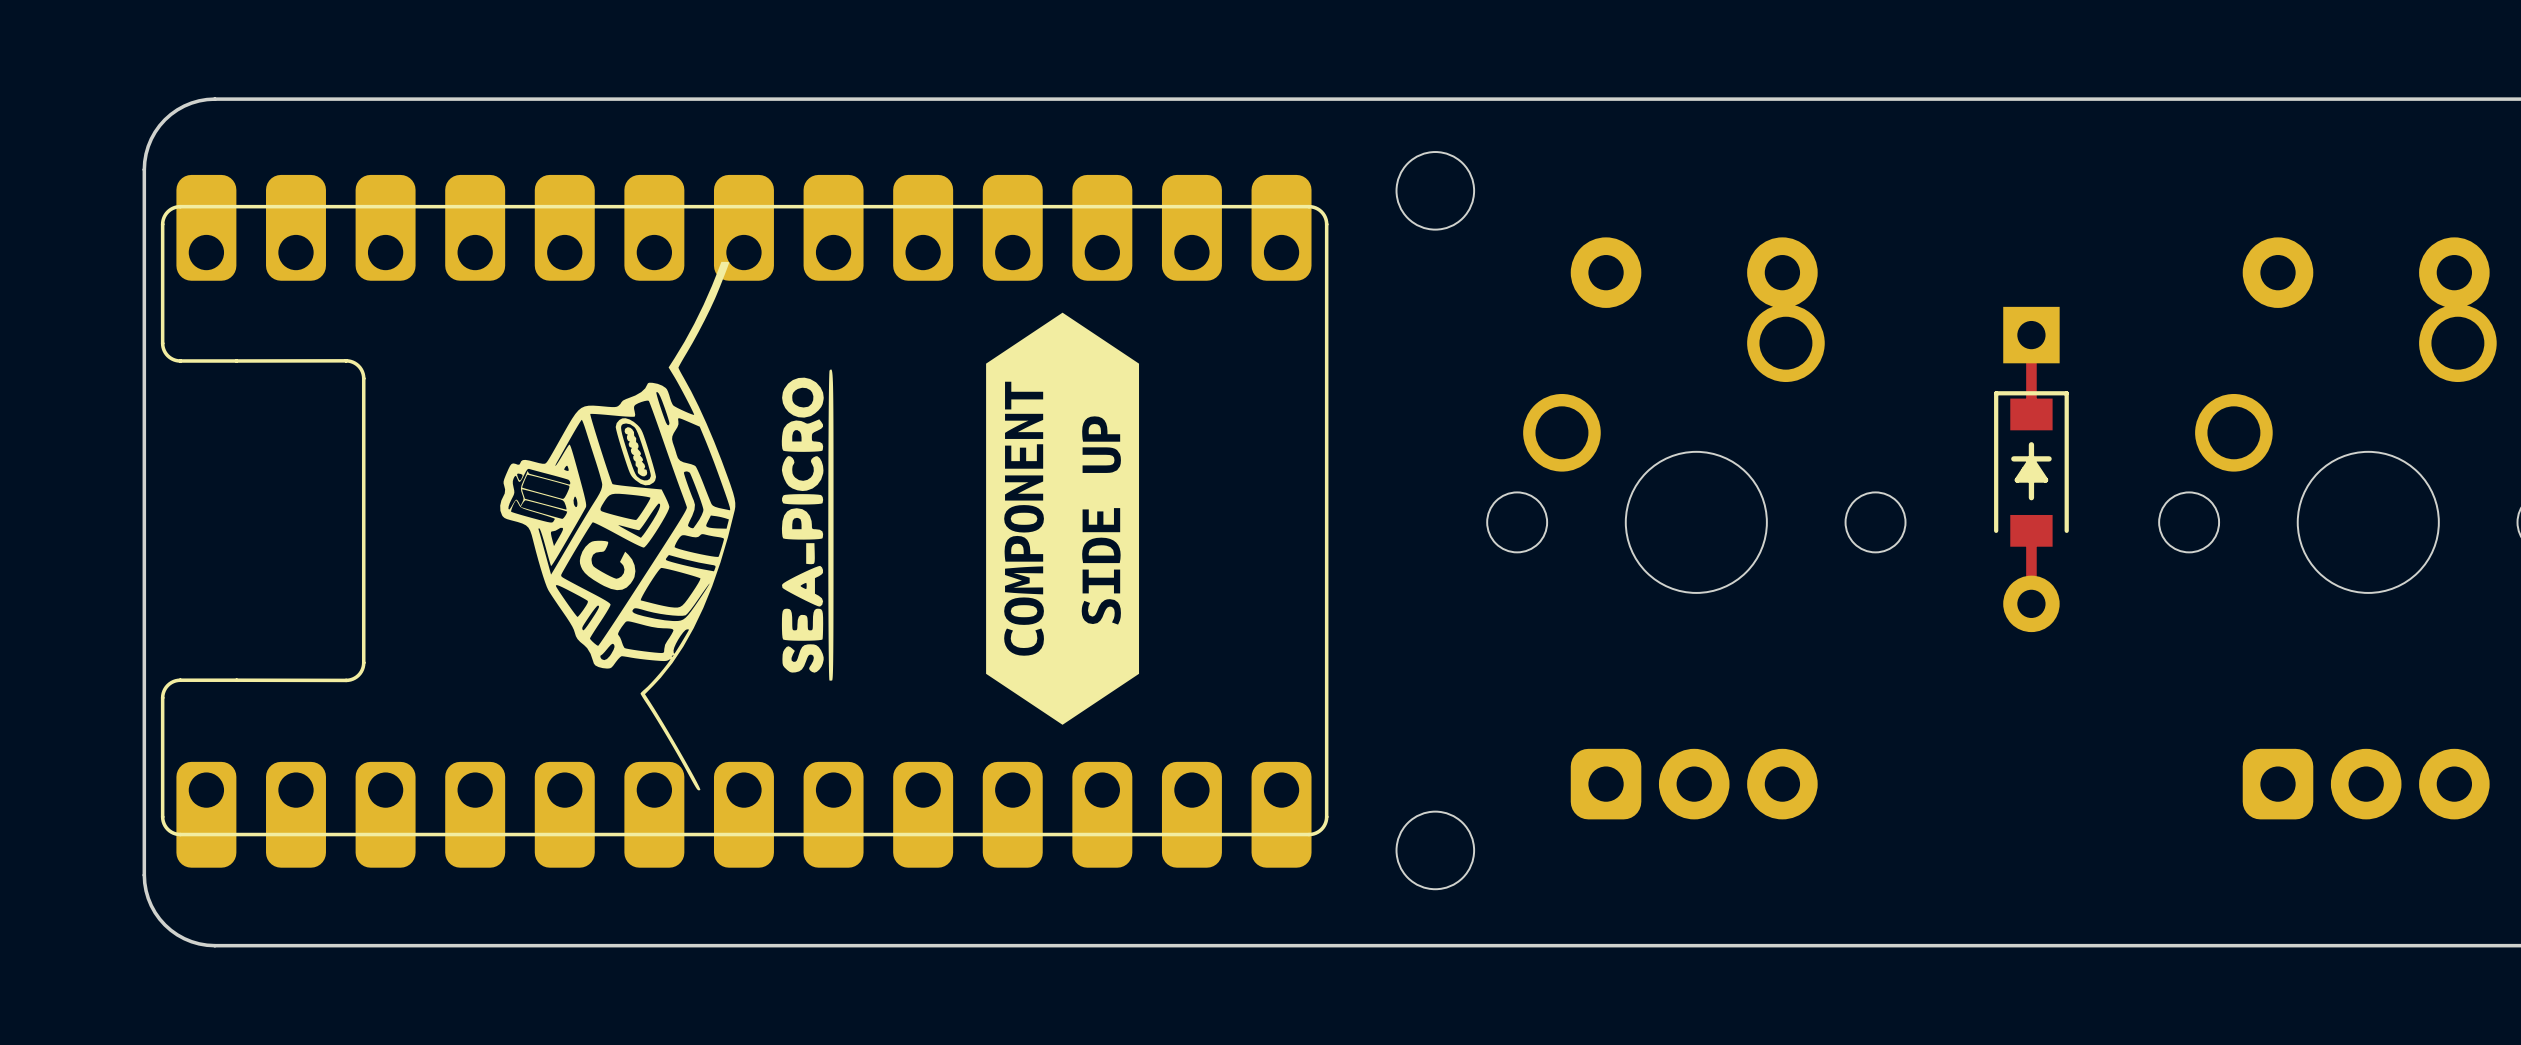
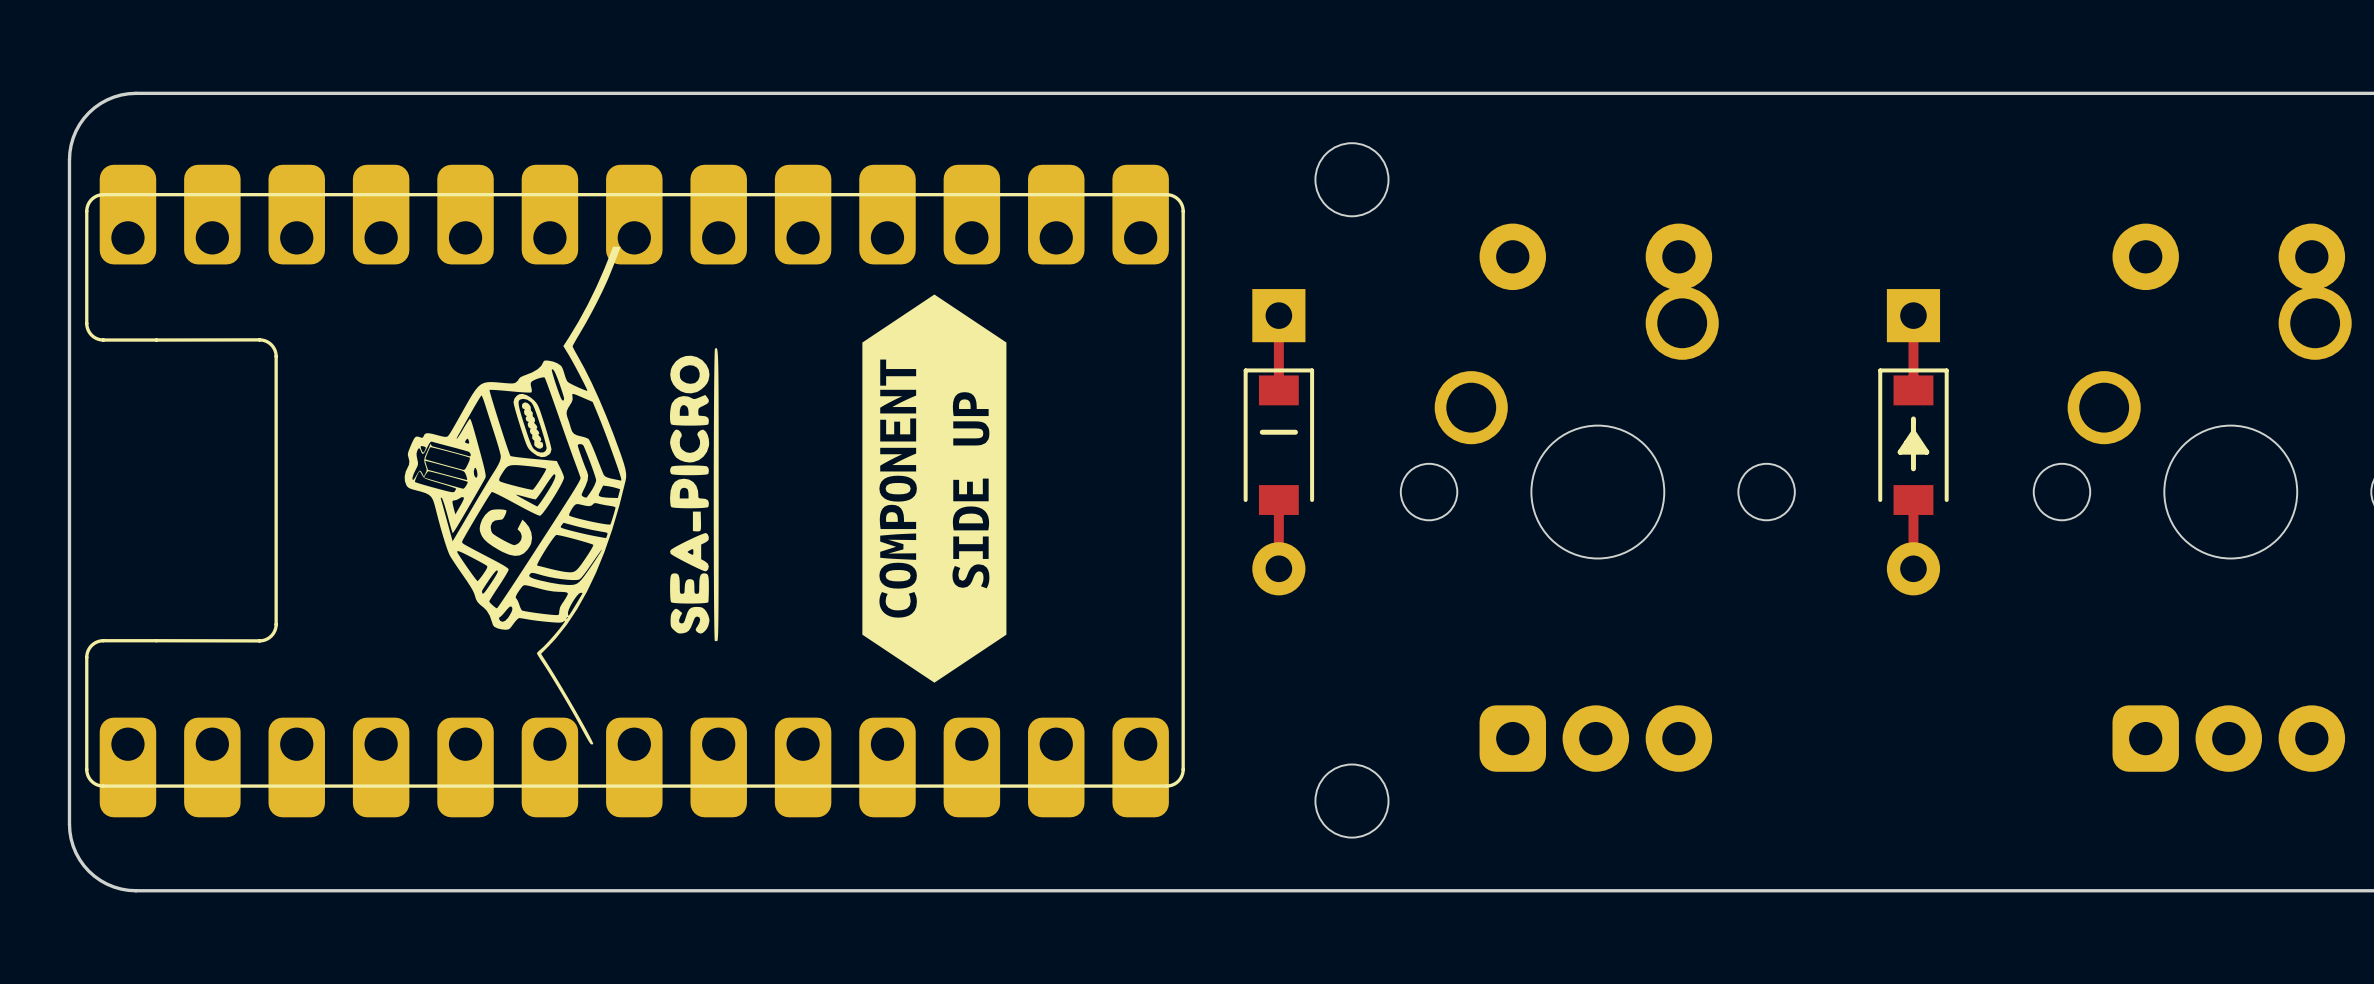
board edge: (214, 99) (199, 100) (184, 106) (164, 119) (155, 132) (148, 146) (144, 169) (144, 883) (151, 905) (159, 919) (170, 930) (191, 941) (214, 945) -> (202, 93) (128, 93) (107, 99) (94, 107) (79, 124) (73, 137) (69, 159) (69, 824) (71, 839) (76, 853) (83, 865) (94, 876) (113, 887) (135, 890) (202, 890)
line: (2013, 458) (2049, 458) -> (1262, 432) (1295, 432)
part: none -> (1278, 442)
part position: (744, 521) -> (634, 491)

